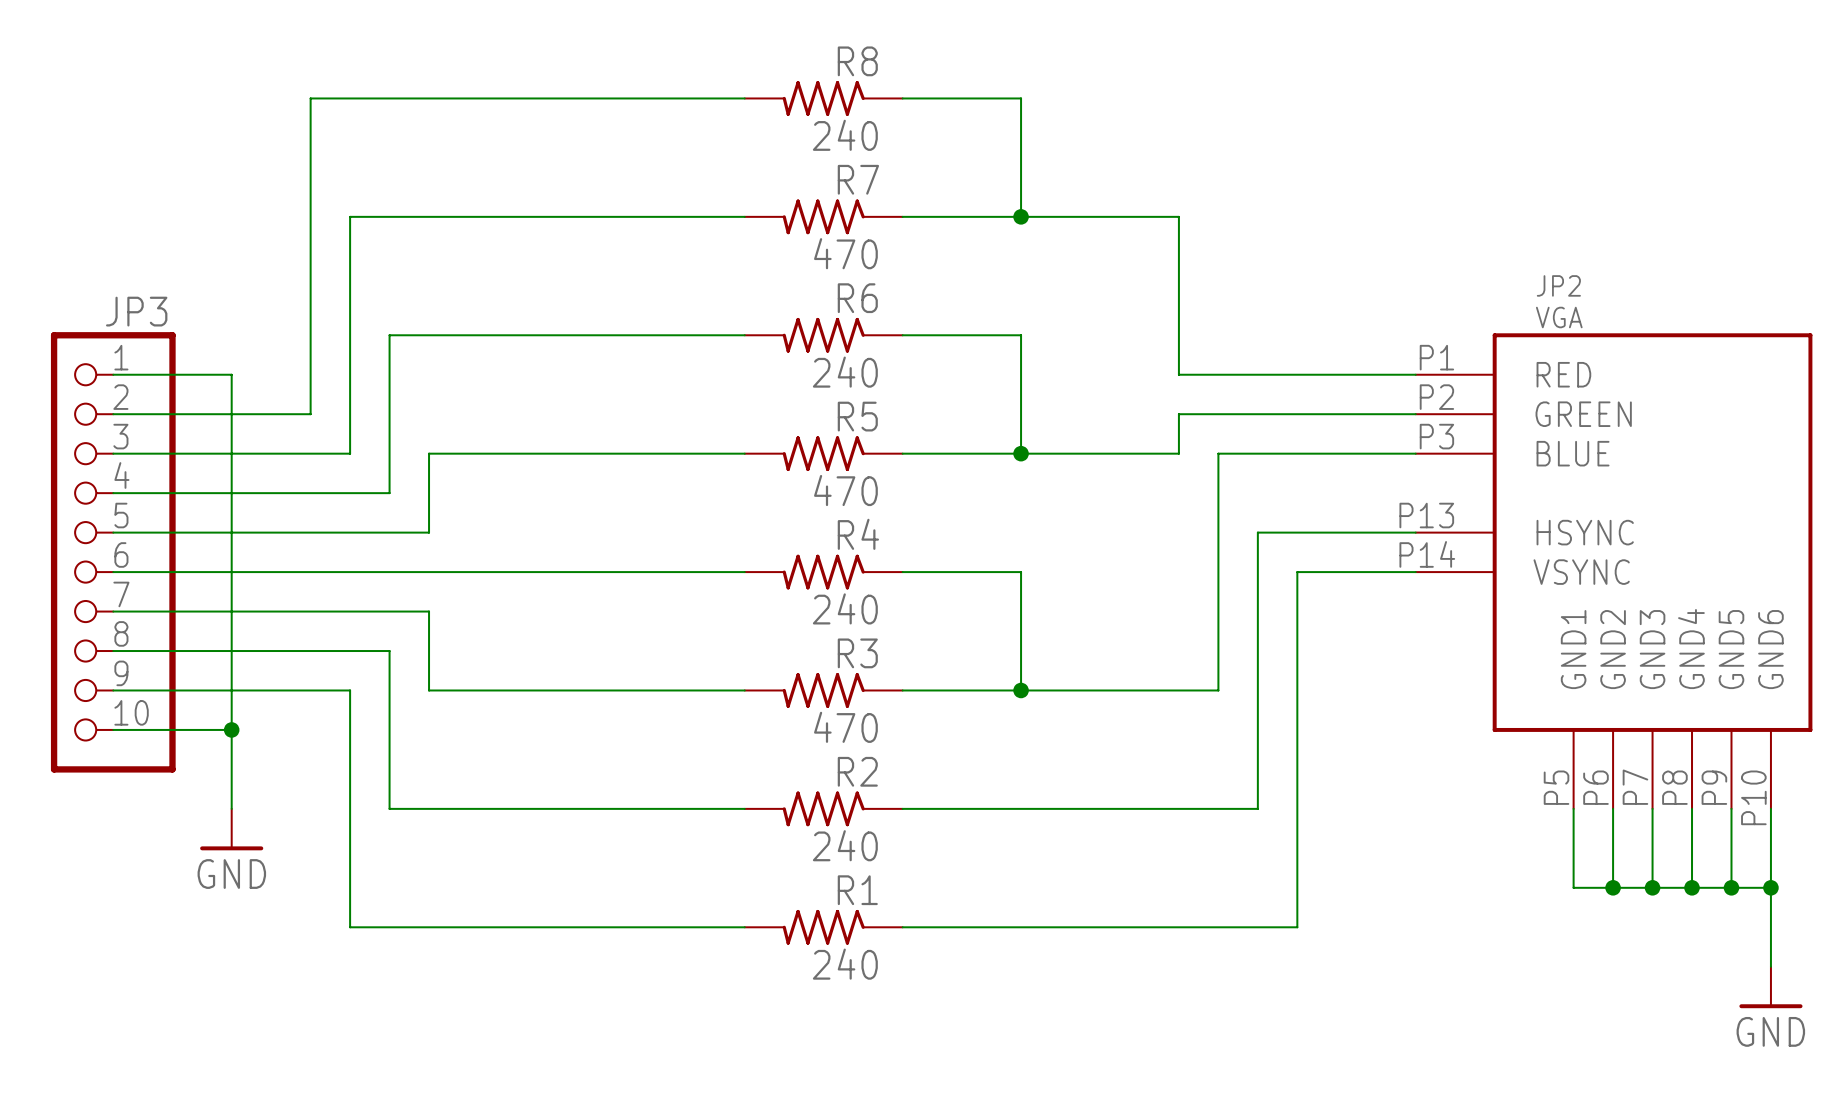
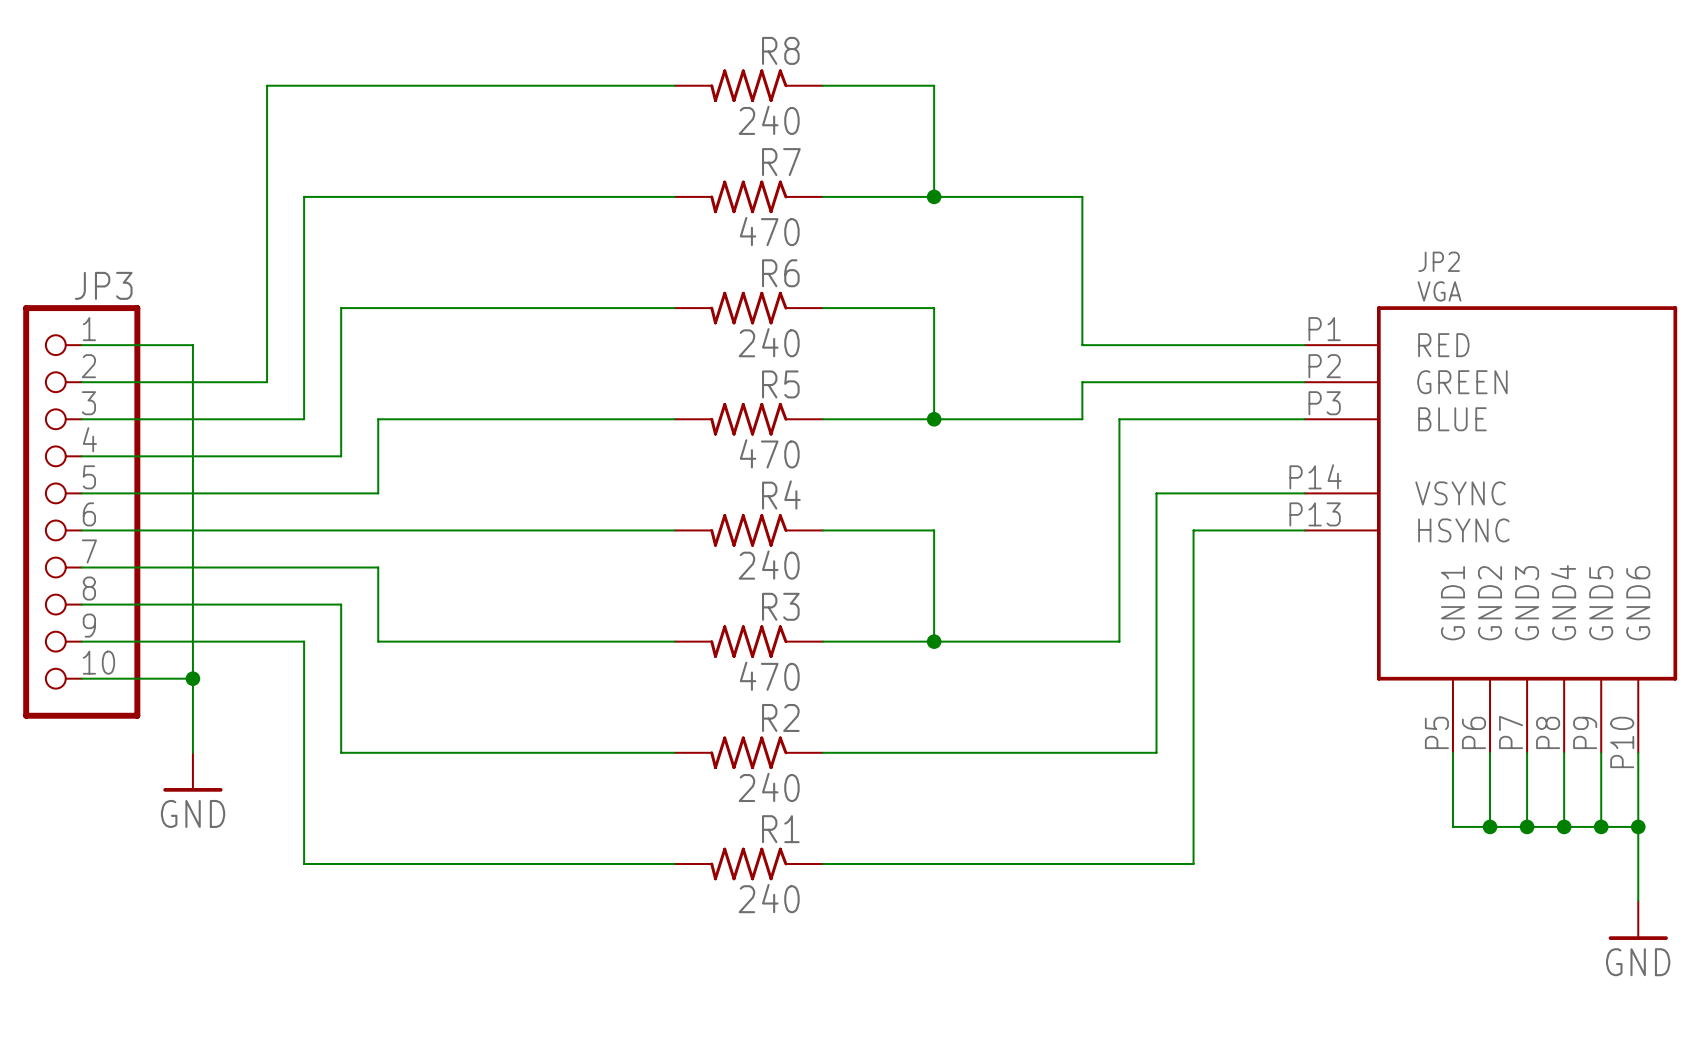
JP2 pin number: P13 (1426, 515) -> P14 (1315, 476)
JP2 pin name: HSYNC (1585, 532) -> VSYNC (1460, 493)
JP2 pin number: P14 (1427, 554) -> P13 (1315, 514)
JP2 pin name: VSYNC (1581, 572) -> HSYNC (1463, 530)

